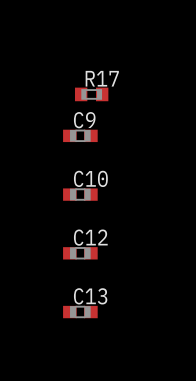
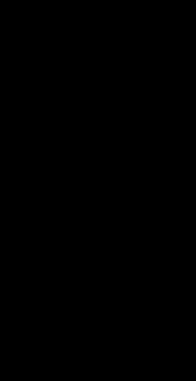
R17: (91, 94) -> none
C9: (80, 135) -> none
C10: (80, 194) -> none
C12: (80, 253) -> none
C13: (80, 312) -> none

